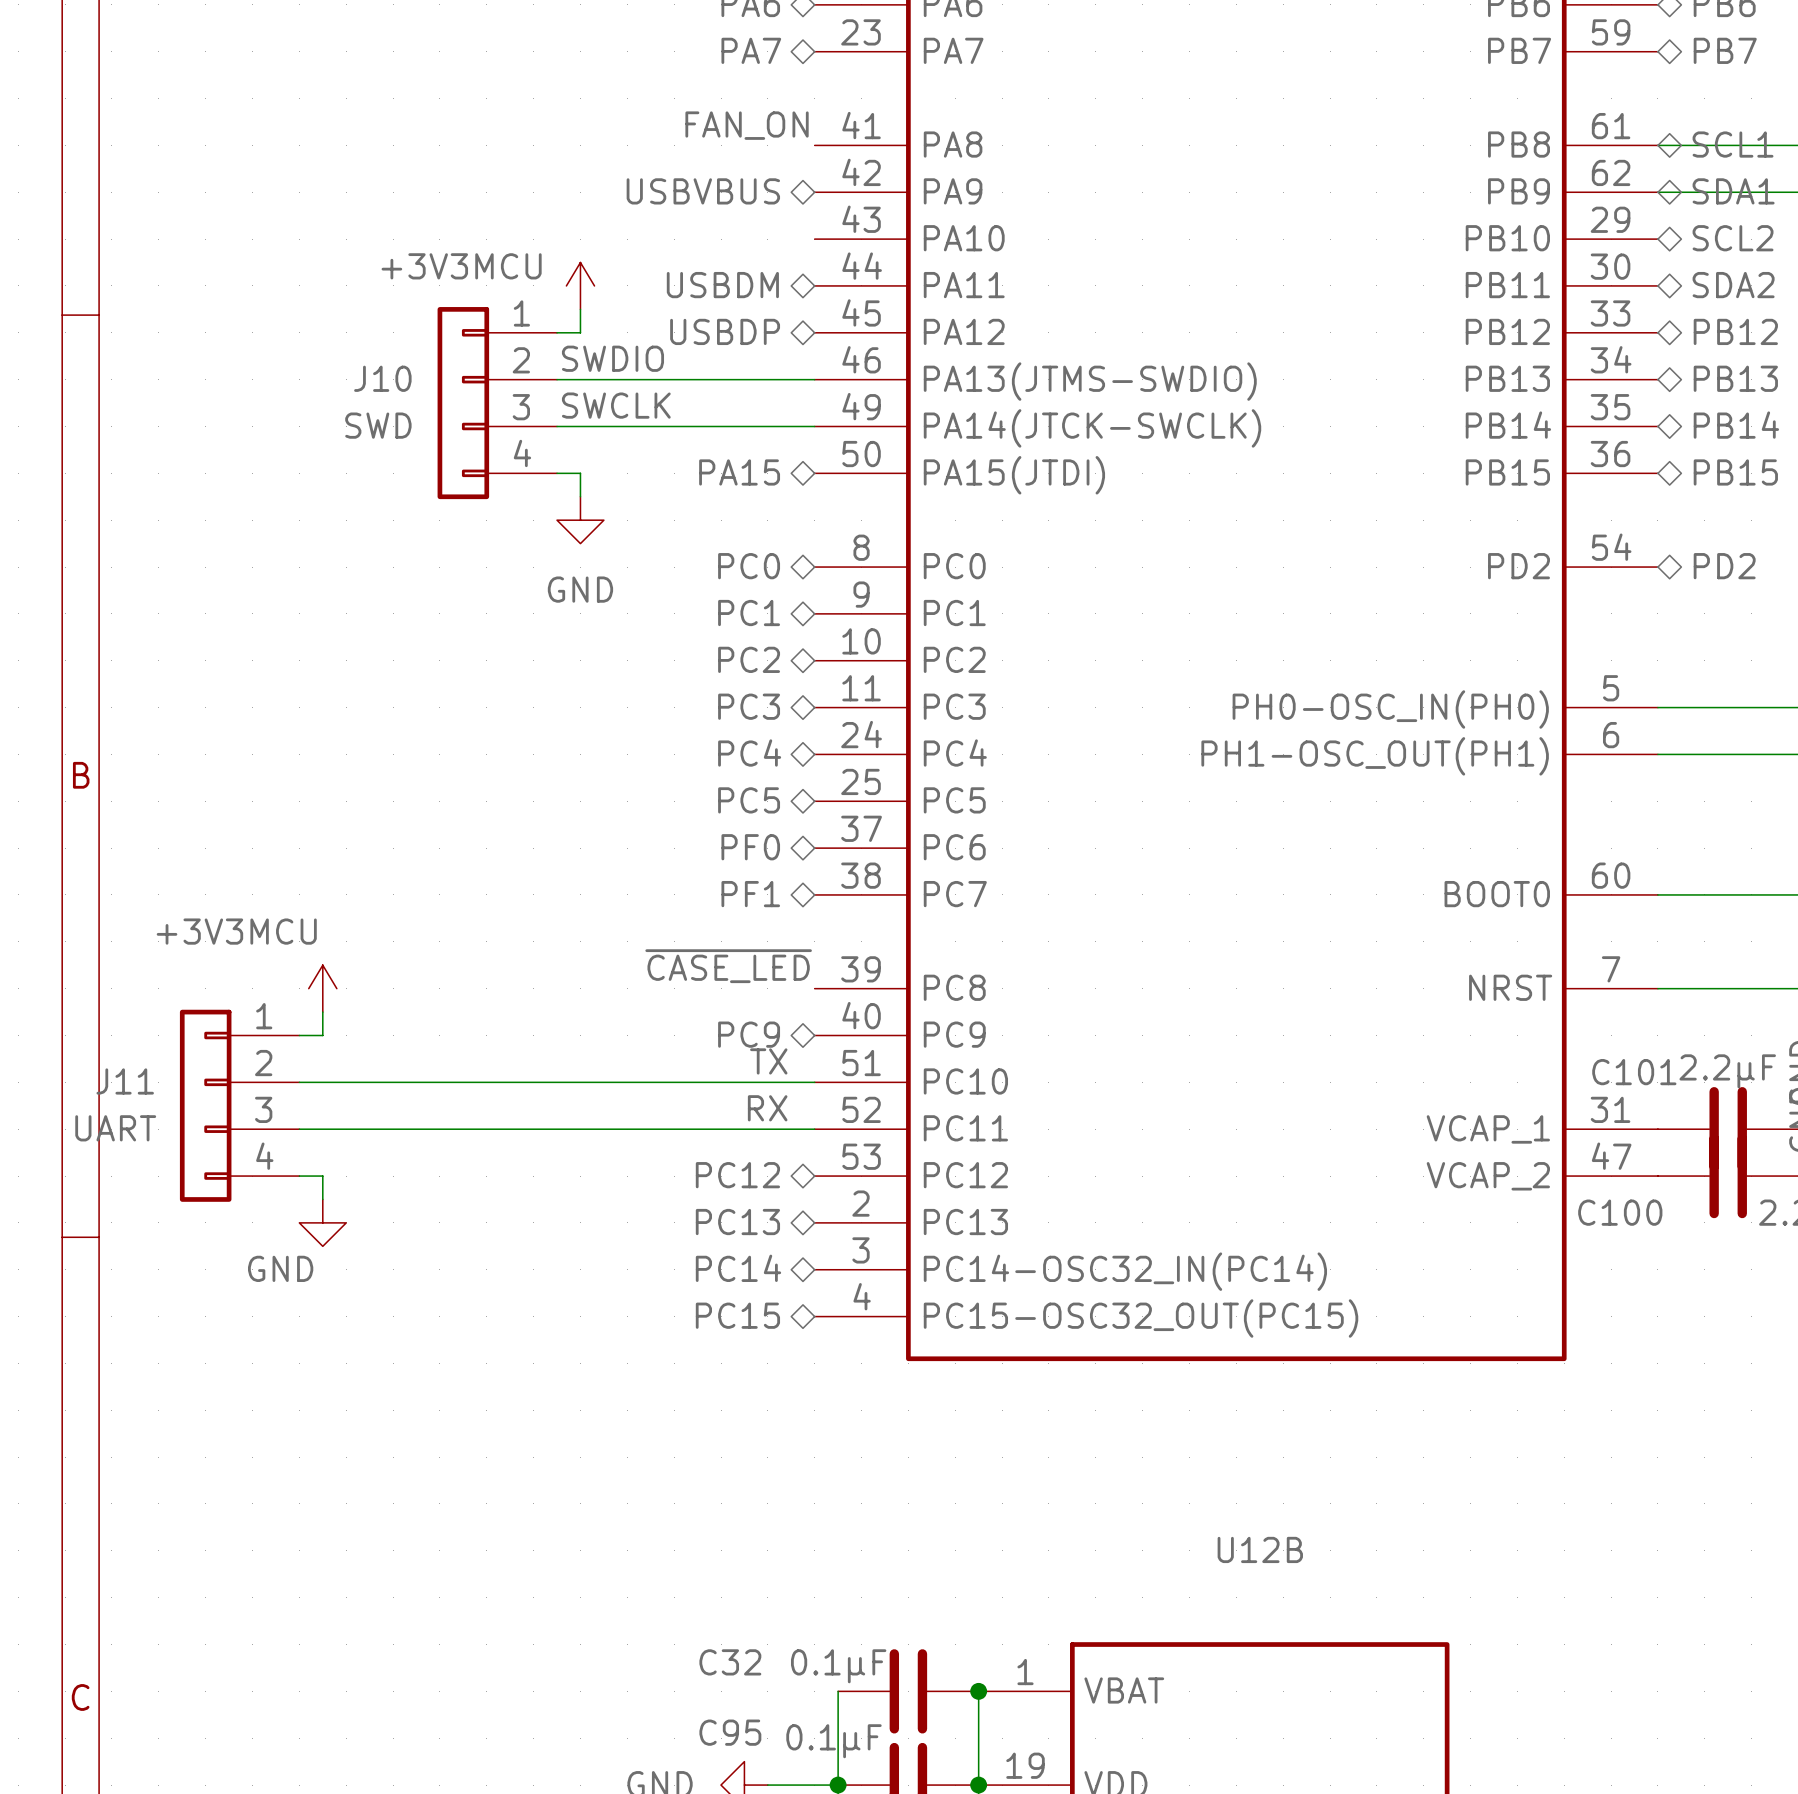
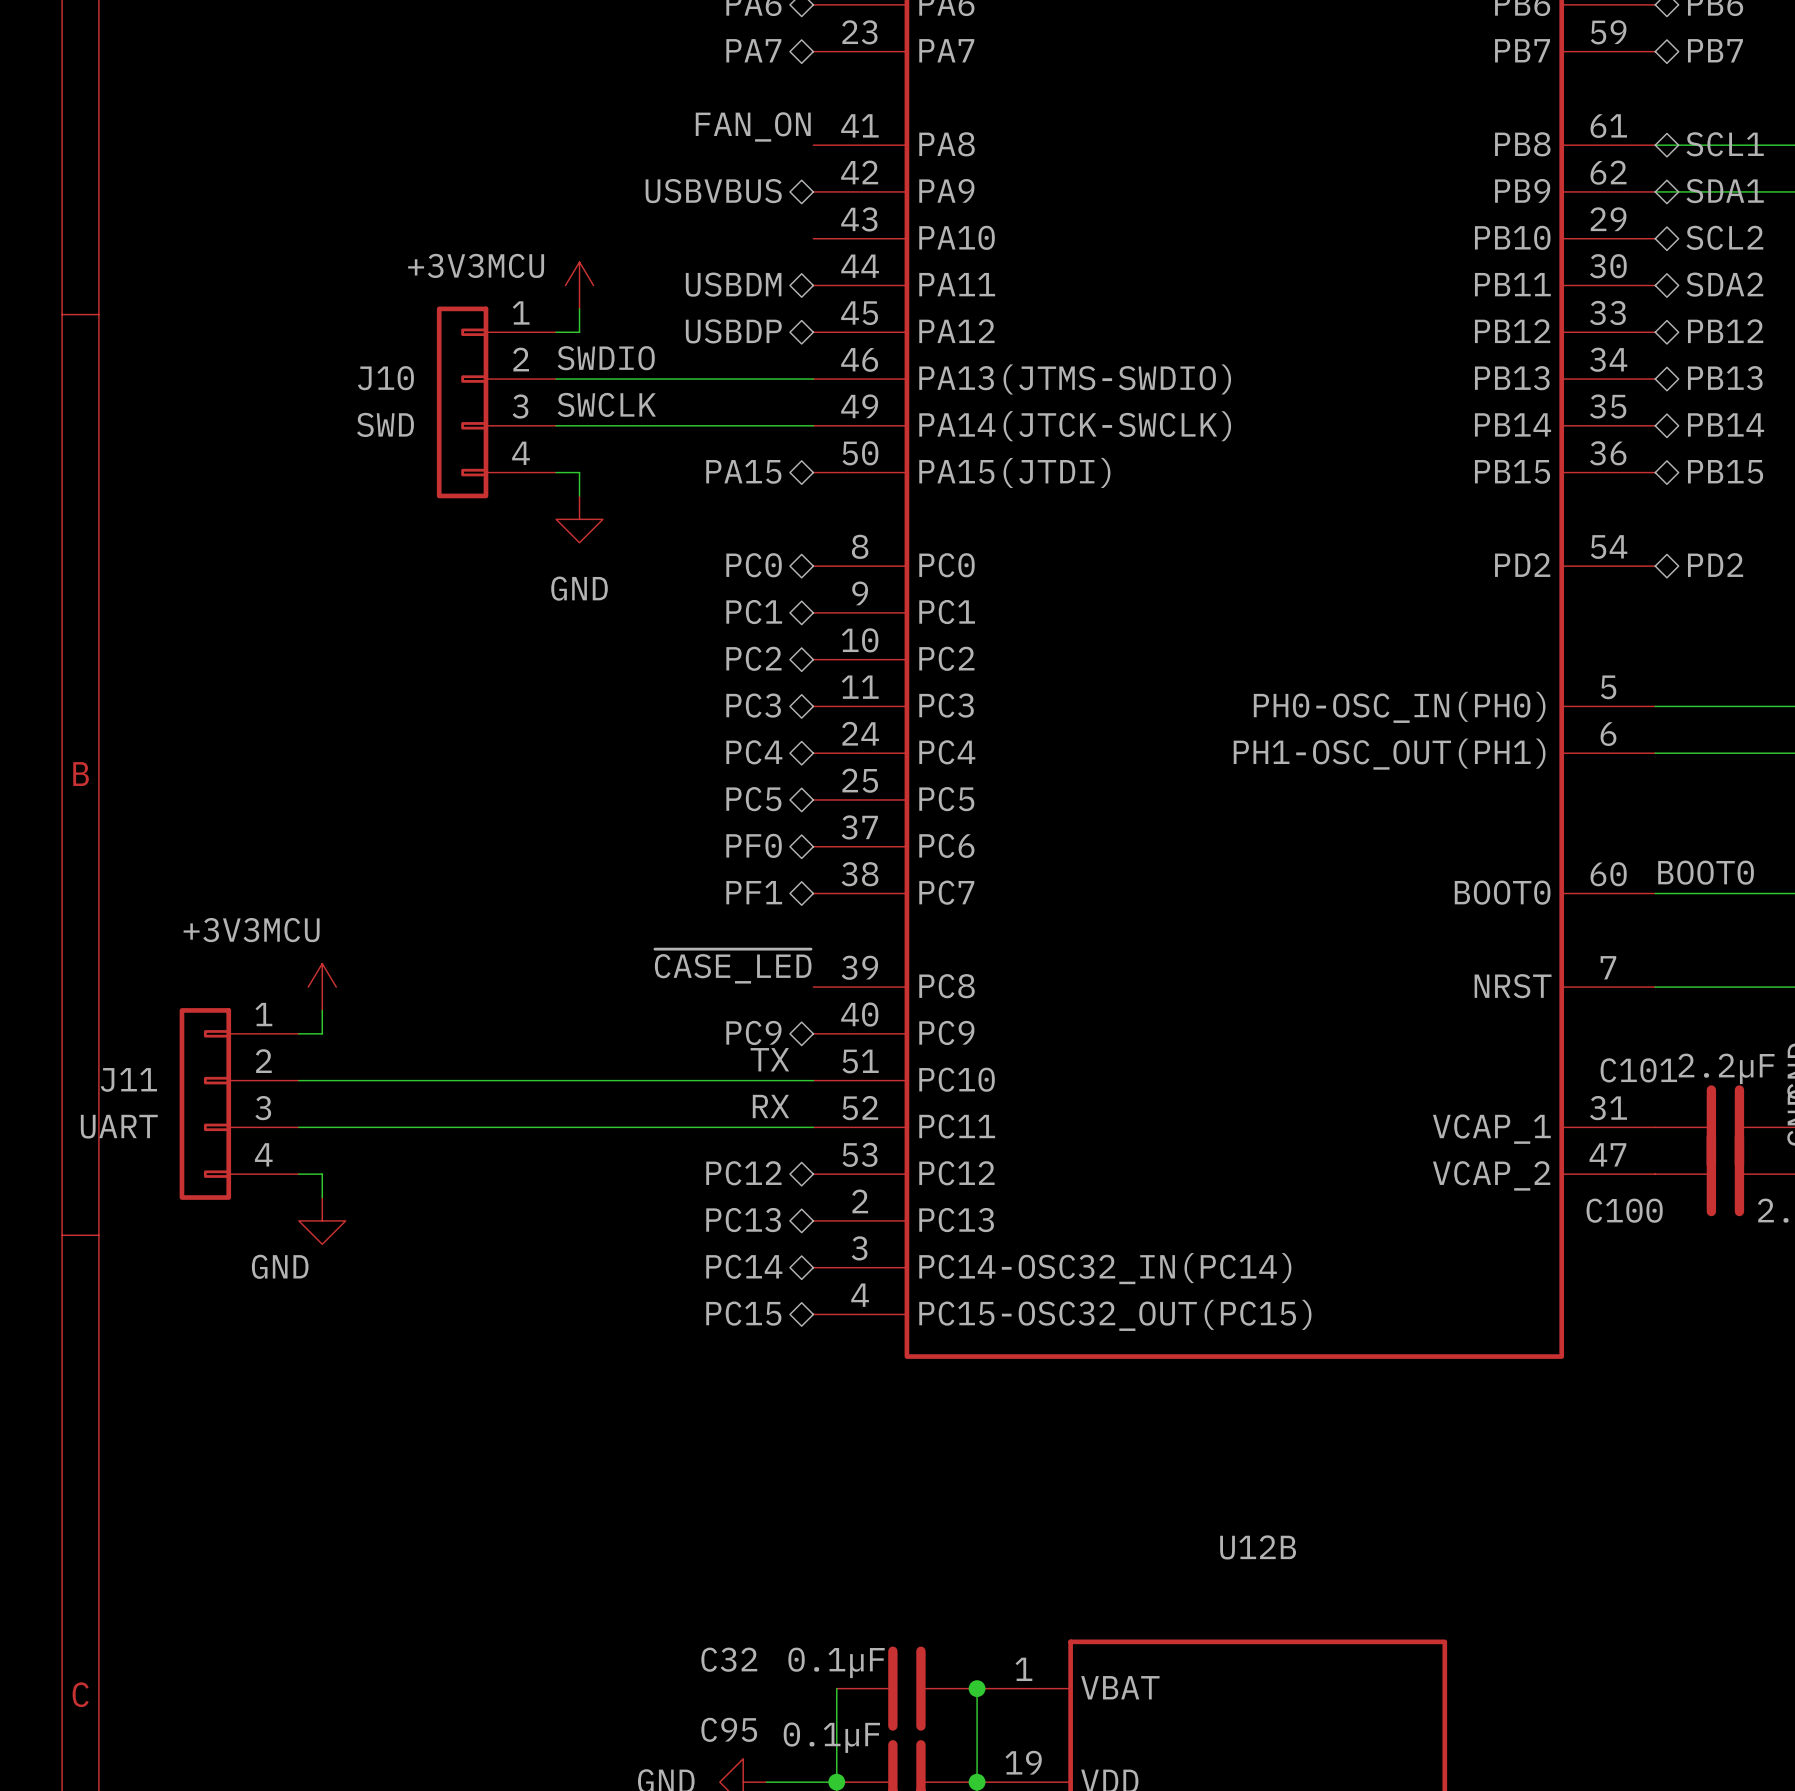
label: none -> BOOT0 (1706, 872)

